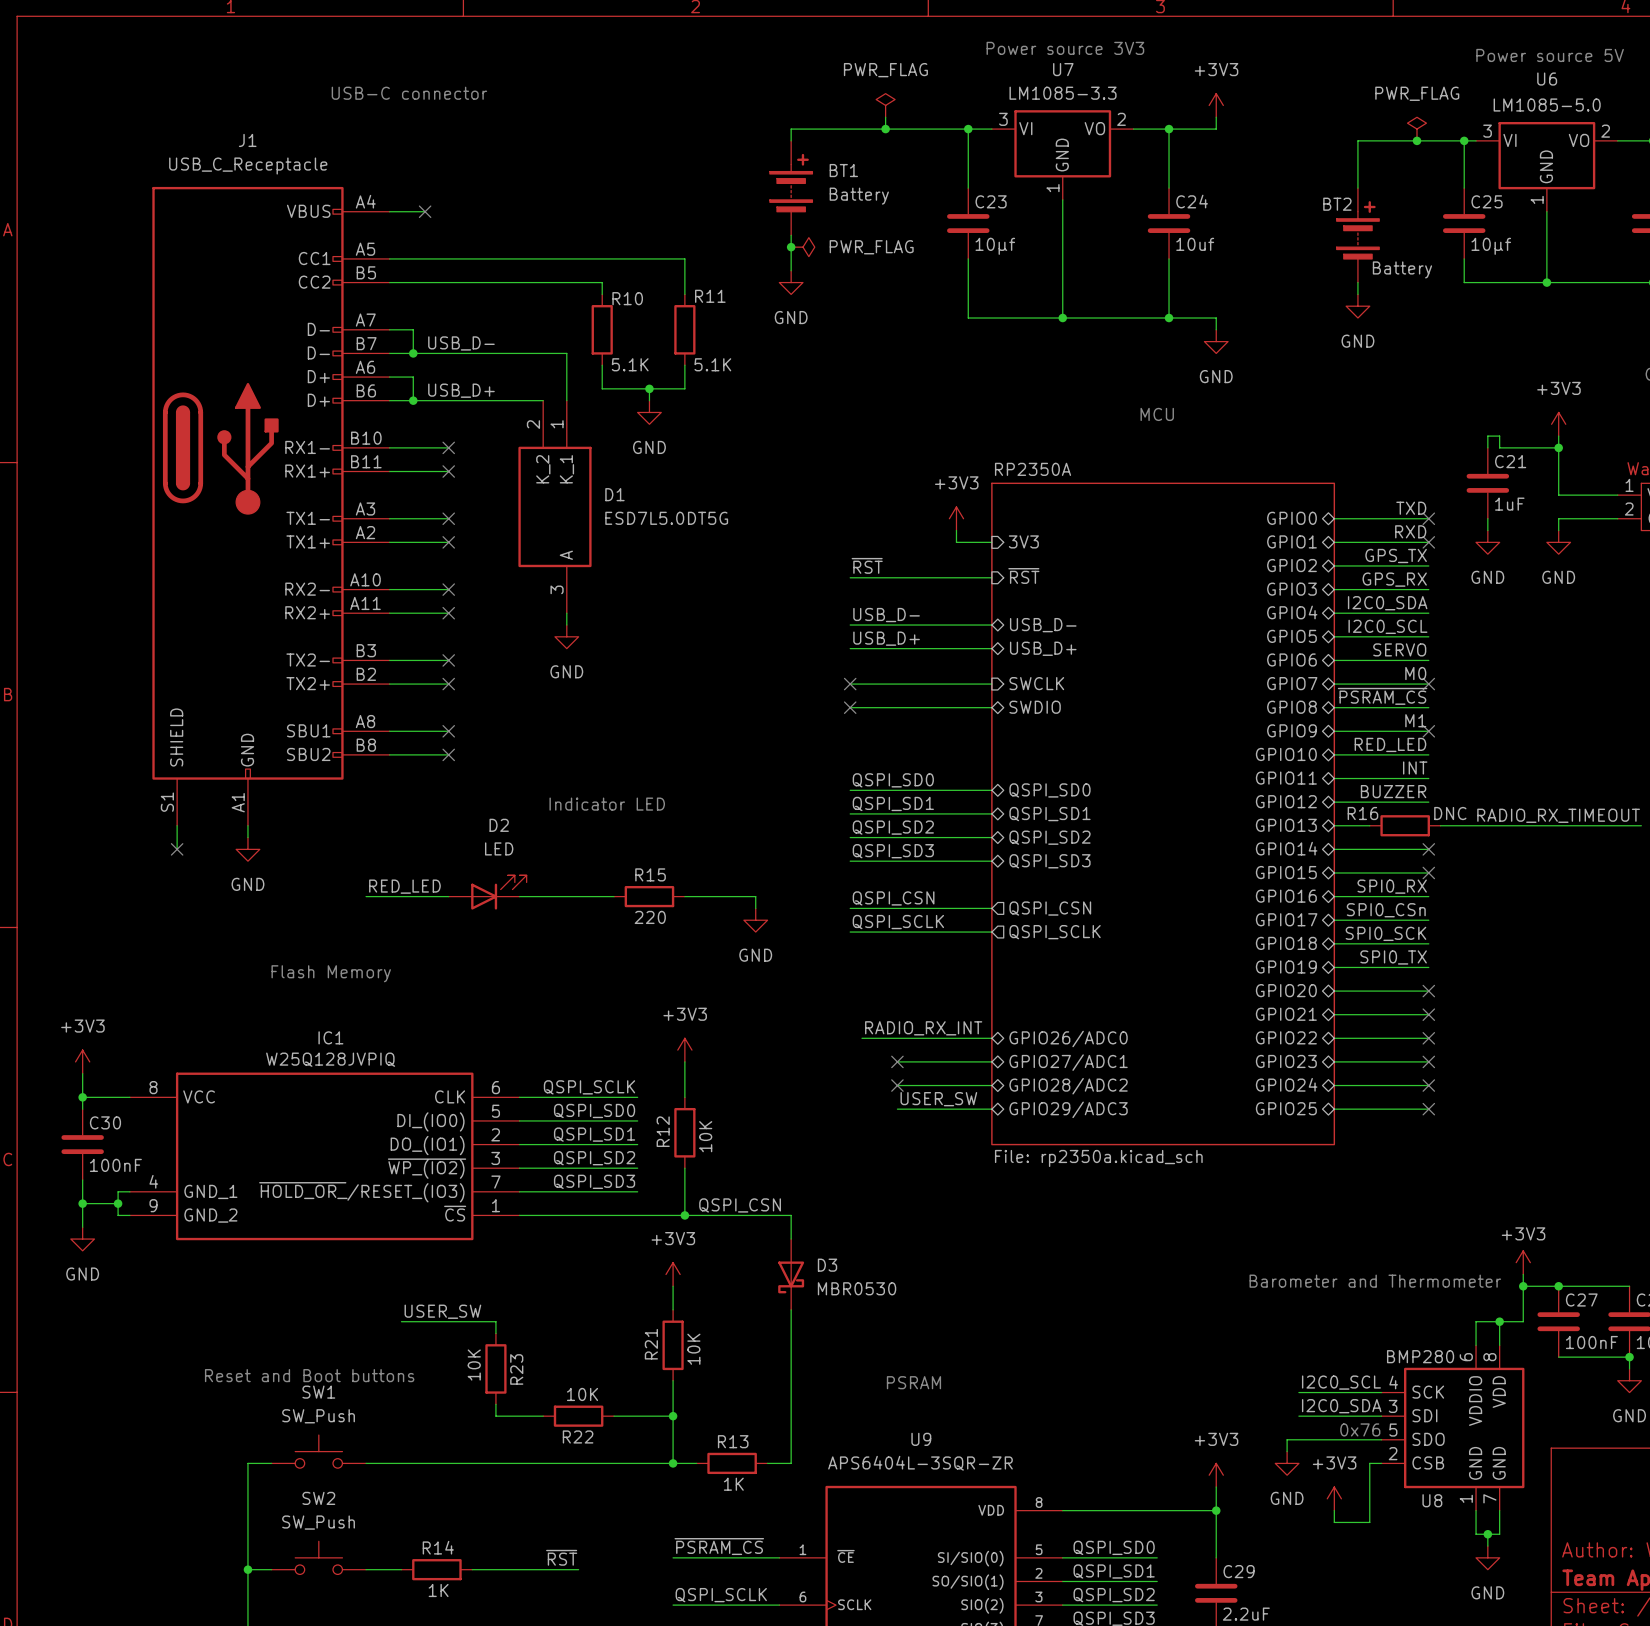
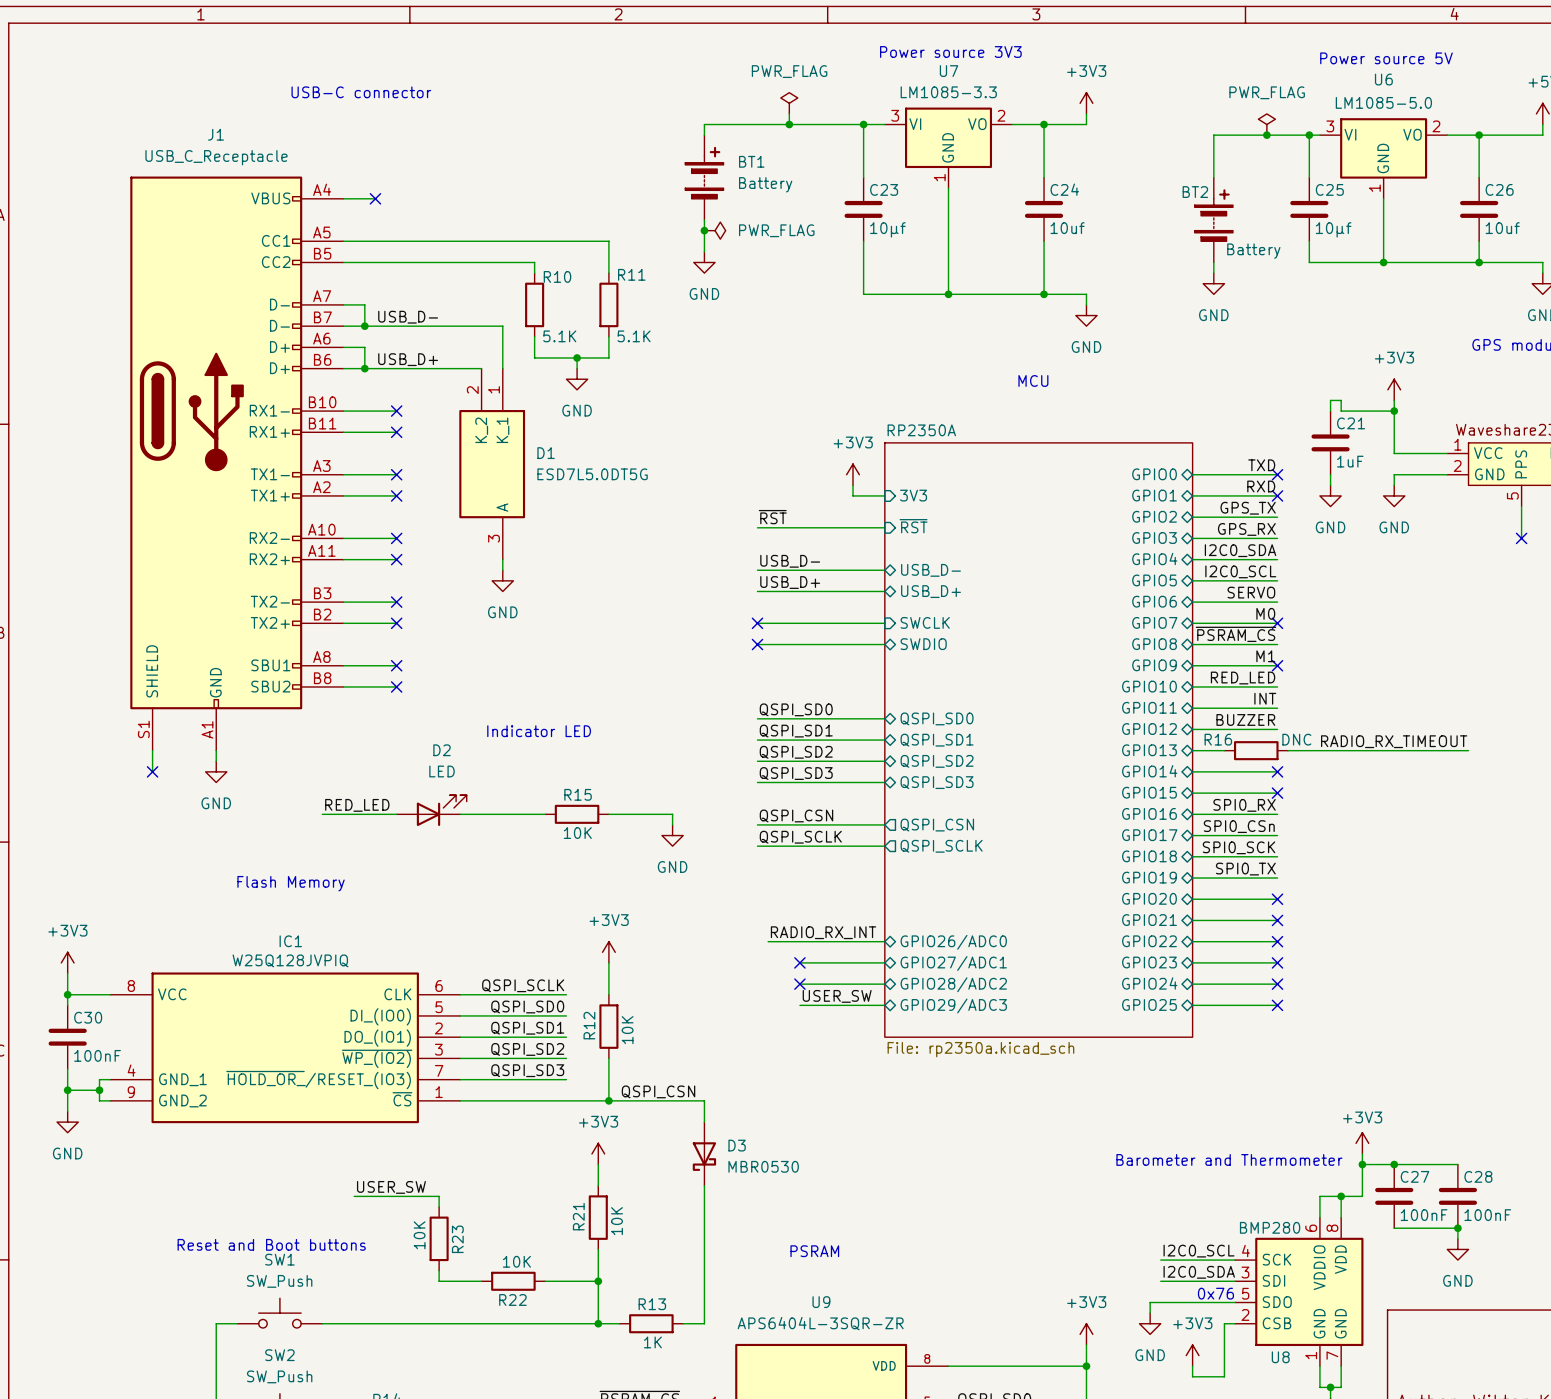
R15 value: 220 (650, 917) -> 10K (577, 833)

